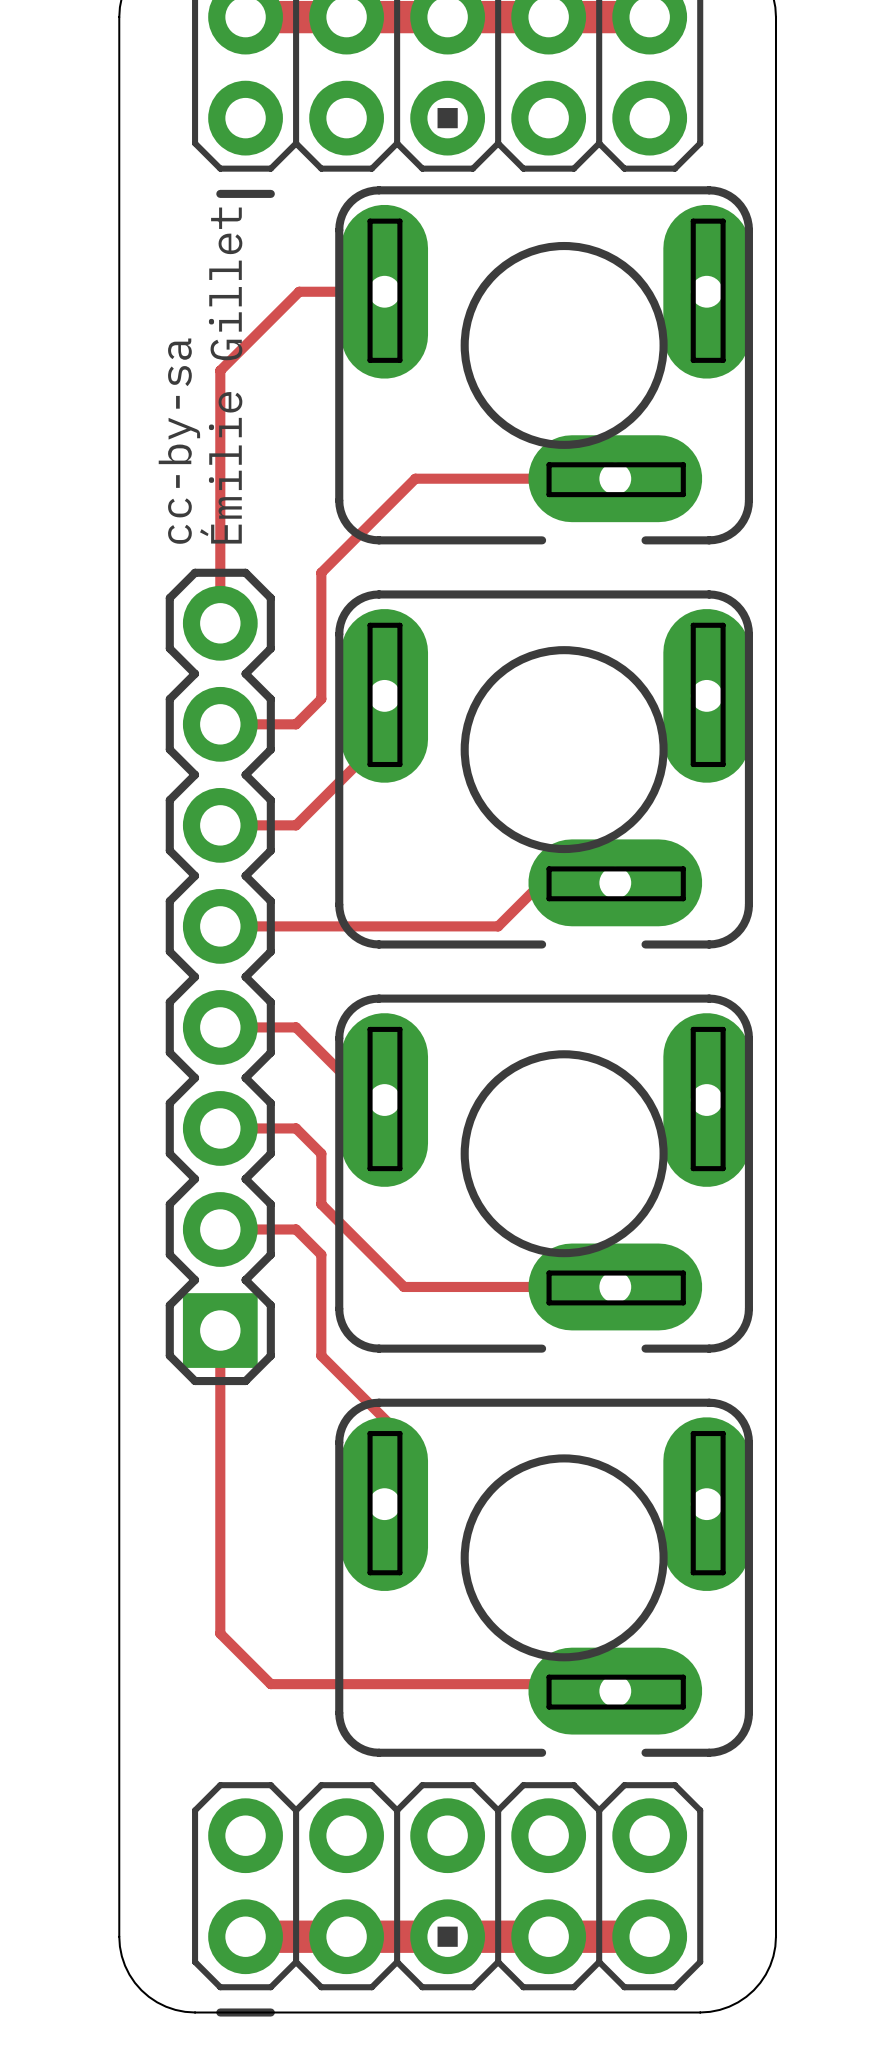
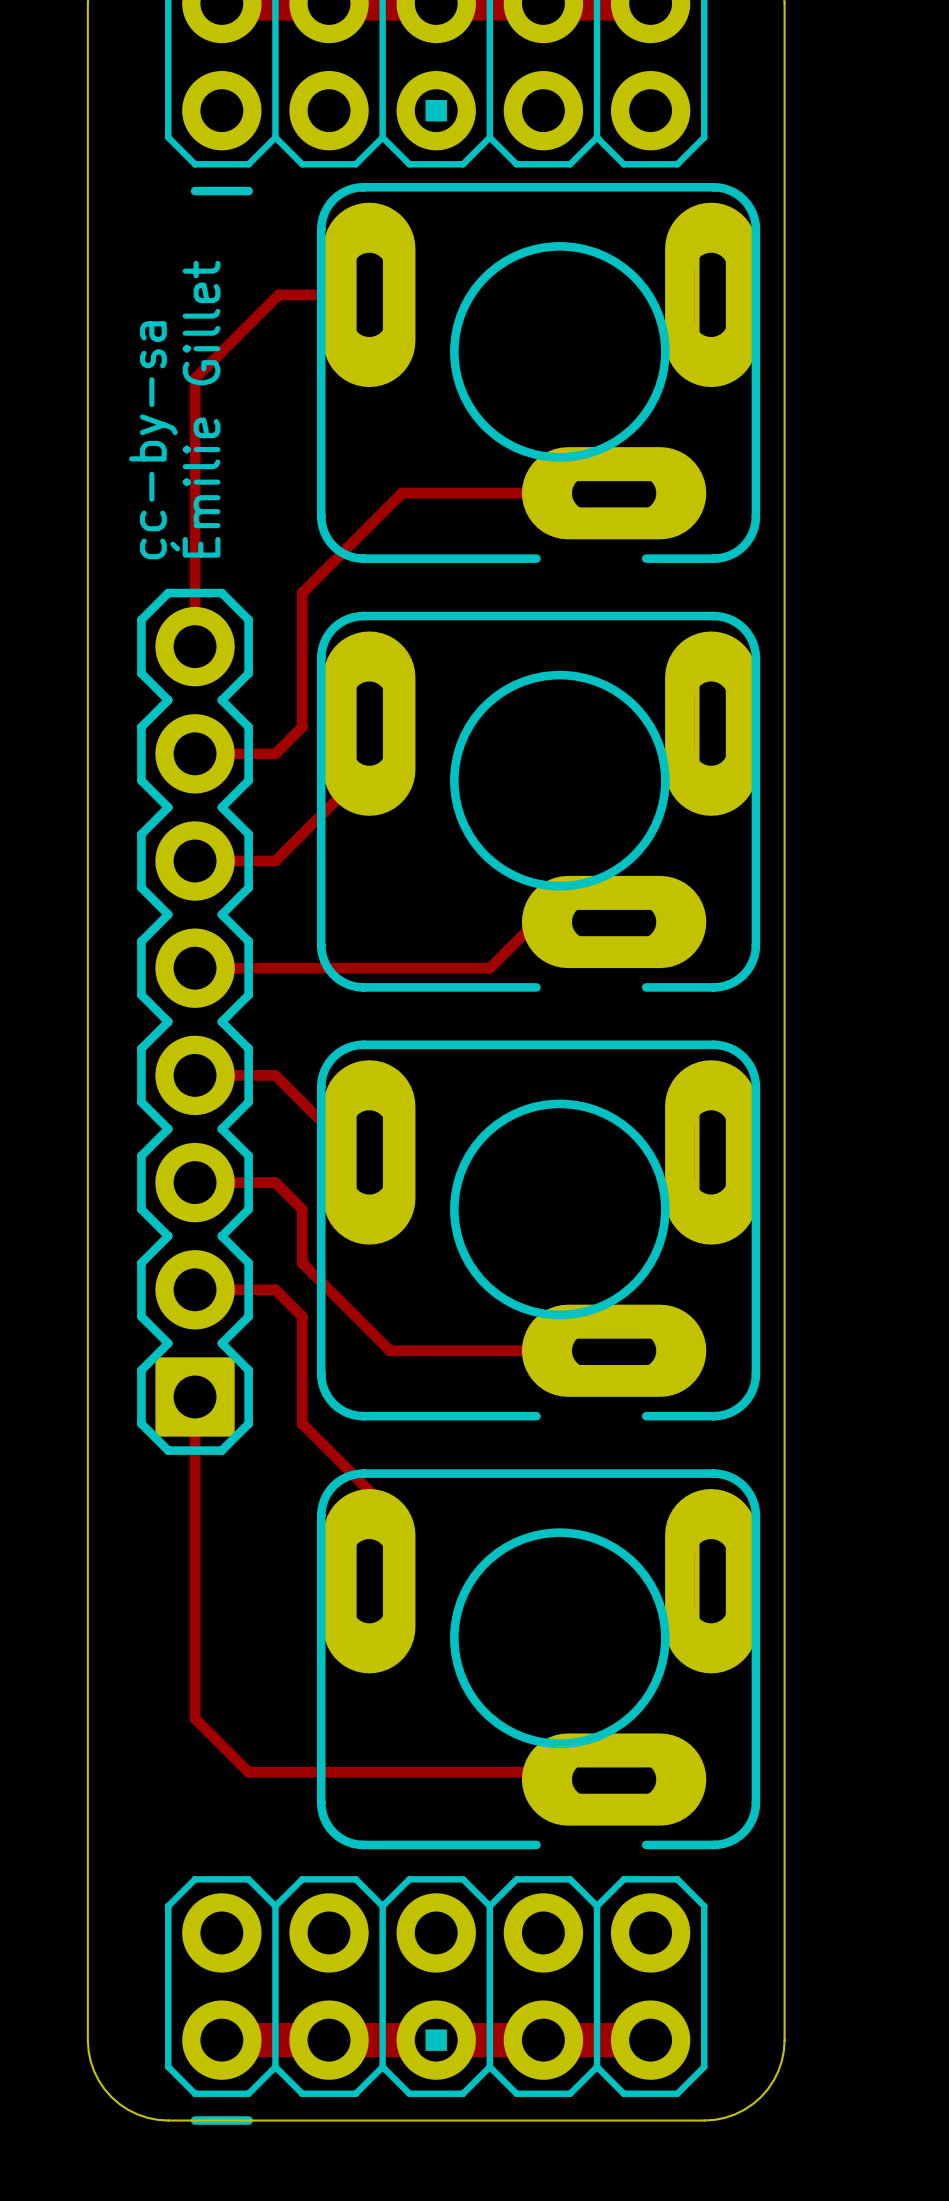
part footprint: [335, 186, 753, 545] -> [316, 182, 761, 563]
part footprint: [335, 590, 753, 949] -> [316, 611, 761, 992]
part footprint: [335, 994, 753, 1353] -> [316, 1040, 761, 1421]
part footprint: [335, 1398, 753, 1757] -> [316, 1469, 761, 1850]

